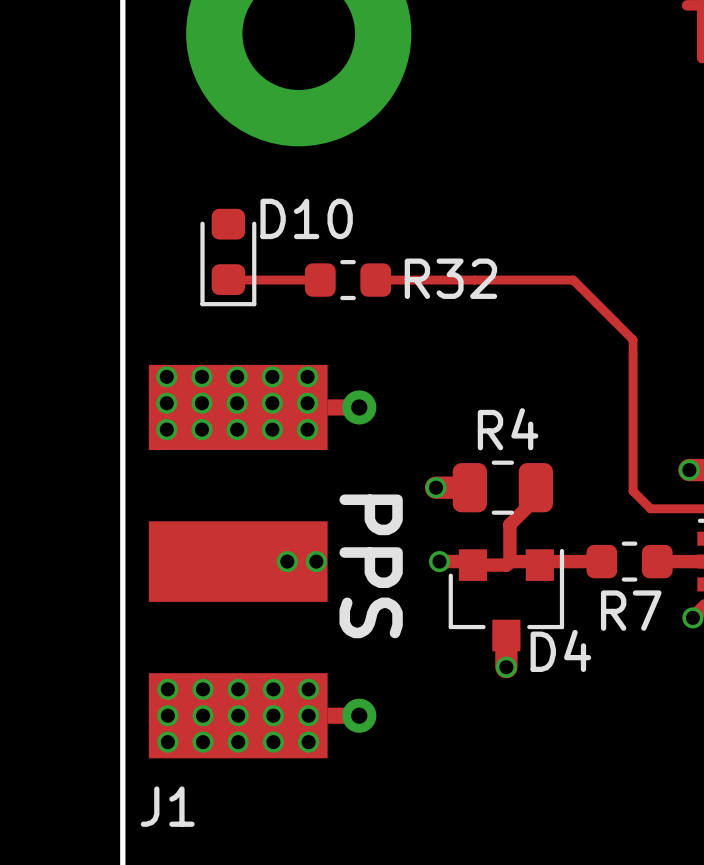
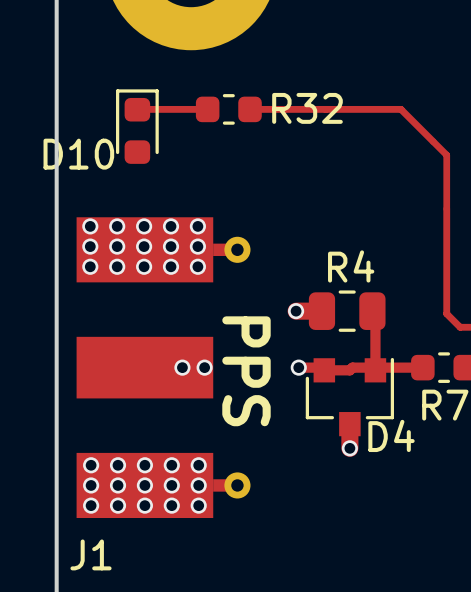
D10 rotation: 0° (228, 257) -> 180° (137, 126)
track: (228, 280) (321, 280) -> (137, 109) (208, 109)
R32 position: (348, 280) -> (228, 109)
track: (374, 280) (573, 280) (633, 339) -> (249, 109) (400, 109) (446, 155) (446, 198)
track: none -> (372, 311) (375, 314) (375, 370)
track: (536, 498) (509, 524) (509, 561) -> none

